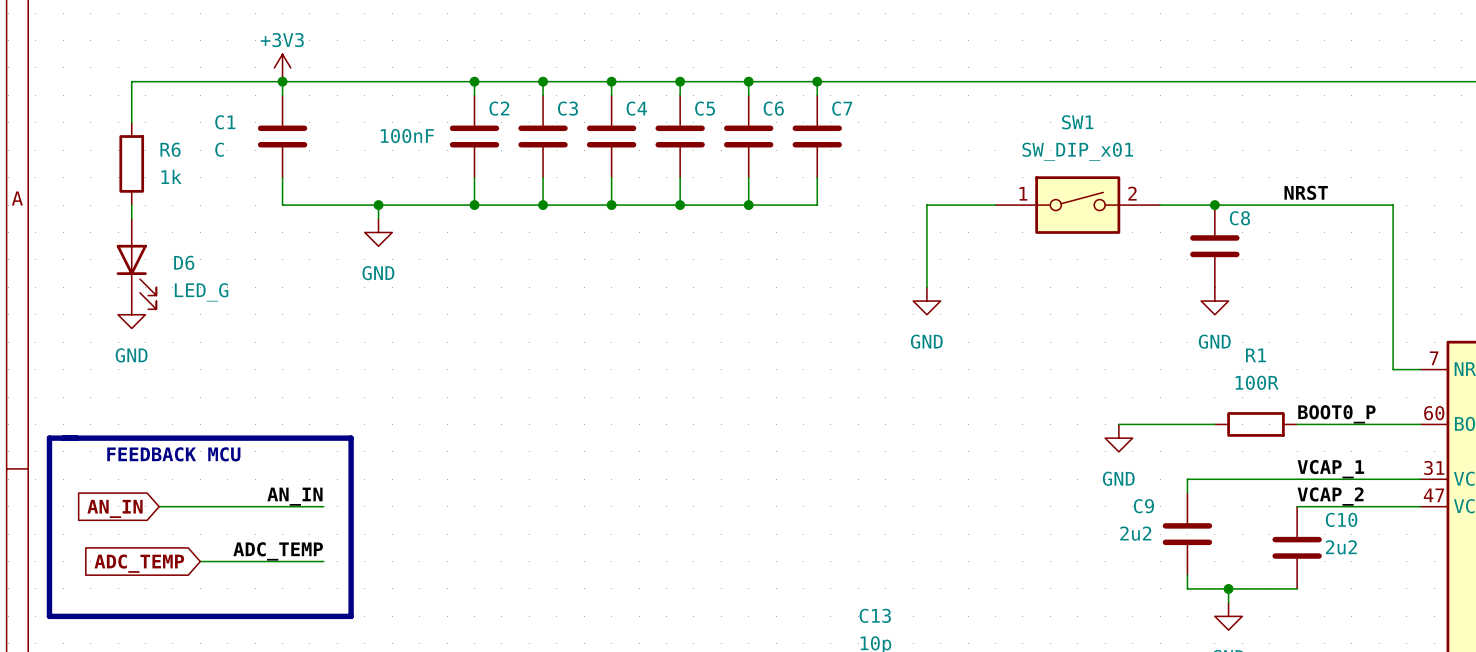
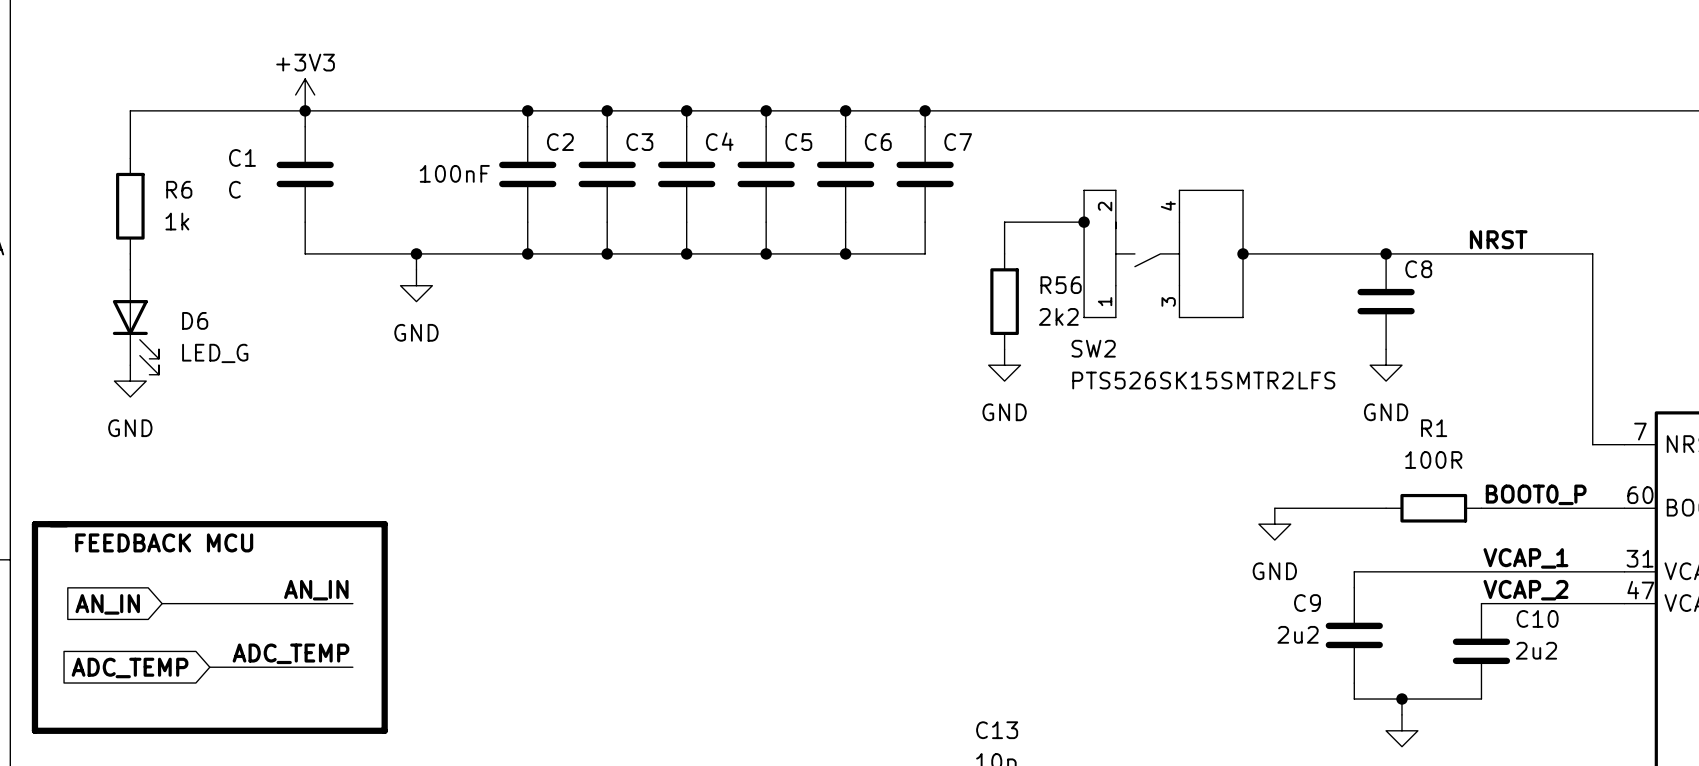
wire: none -> (1115, 190) (1084, 190) (1084, 317) (1115, 317)
wire: none -> (1179, 190) (1243, 190) (1243, 317) (1179, 317)
wire: none -> (1084, 222) (1004, 222) (1004, 253)
junction: none -> (1084, 222)
wire: (995, 205) (926, 205) (926, 287) -> none
SW2: none -> PTS526SK15SMTR2LFS (1147, 253)
SW1: SW_DIP_x01 (1077, 205) -> none
junction: none -> (1243, 253)
R56: none -> 2k2 (1004, 301)
power symbol position: GND (926, 301) -> GND (1004, 365)

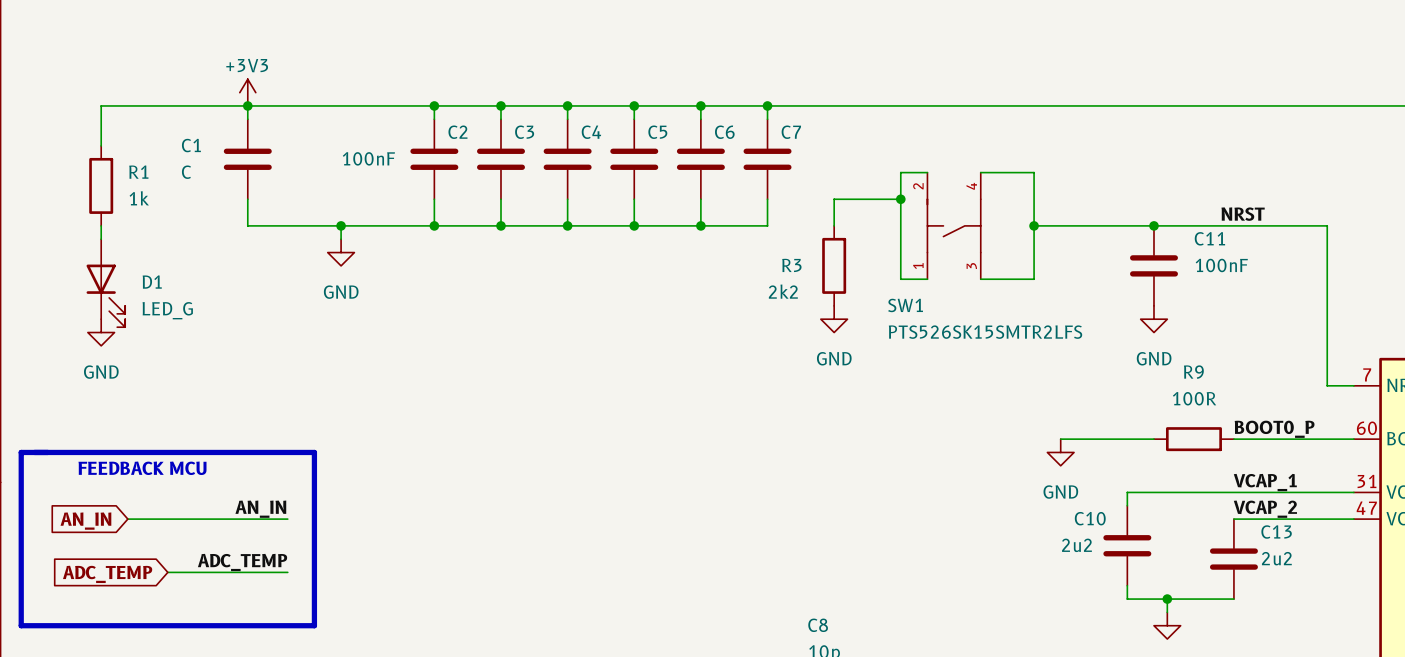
R6 name: R6 (179, 189) -> R1 (138, 172)
C8 name: C8 (1418, 269) -> C11 (1209, 238)
R56 name: R56 (1061, 285) -> R3 (791, 265)
C8 value: none -> 100nF (1221, 265)
R56 value position: 2k2 (1058, 316) -> 2k2 (783, 291)
D6 name: D6 (195, 320) -> D1 (152, 282)
SW2 name: SW2 (1093, 348) -> SW1 (905, 305)
R1 name: R1 (1434, 428) -> R9 (1193, 372)
C9 name: C9 (1307, 603) -> C10 (1090, 518)
C10 name: C10 (1537, 618) -> C13 (1276, 532)
C13 name: C13 (997, 730) -> C8 (818, 625)

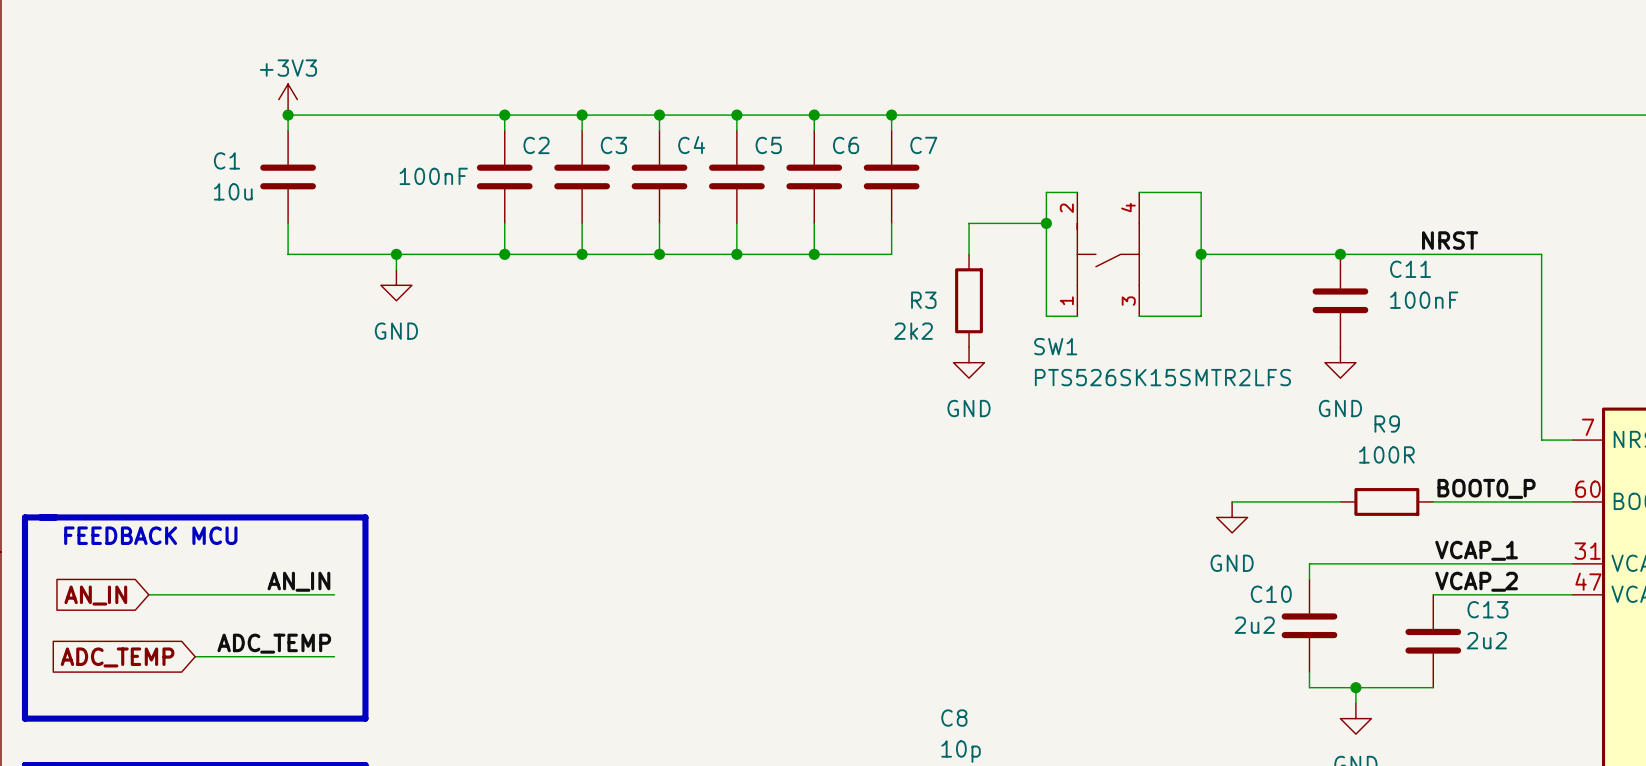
wire: (247, 105) (101, 105) (101, 145) -> none
C1 value: C (186, 172) -> 10u (233, 191)
R1: 1k (101, 185) -> none
wire: (101, 225) (101, 239) -> none
D1: LED_G (105, 283) -> none
power symbol: GND (101, 332) -> none

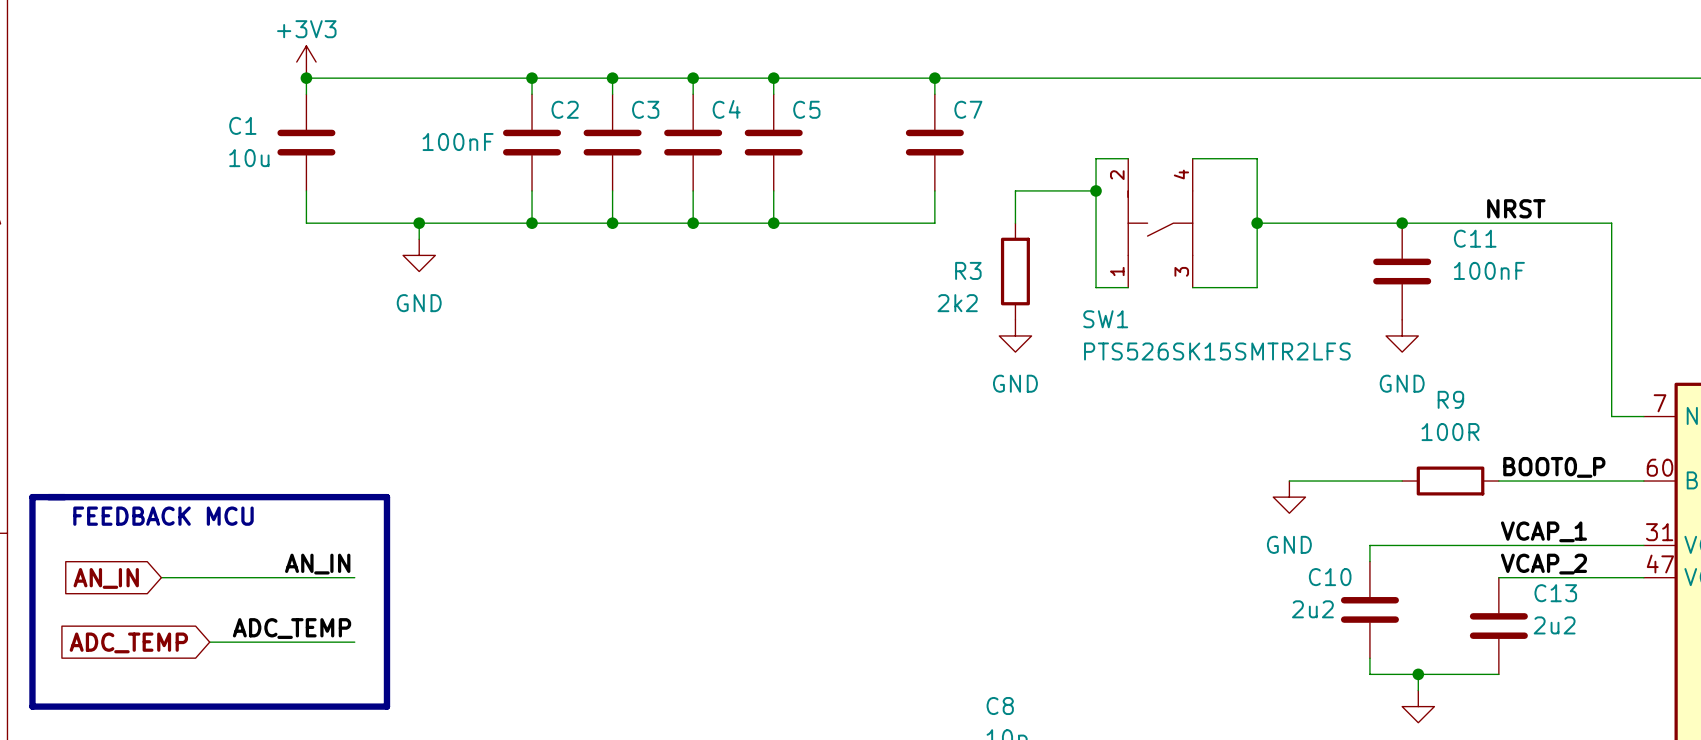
wire: (814, 115) (814, 130) -> none
junction: (814, 115) -> none
C6: (814, 176) -> none
wire: (814, 223) (814, 254) -> none
junction: (814, 254) -> none

